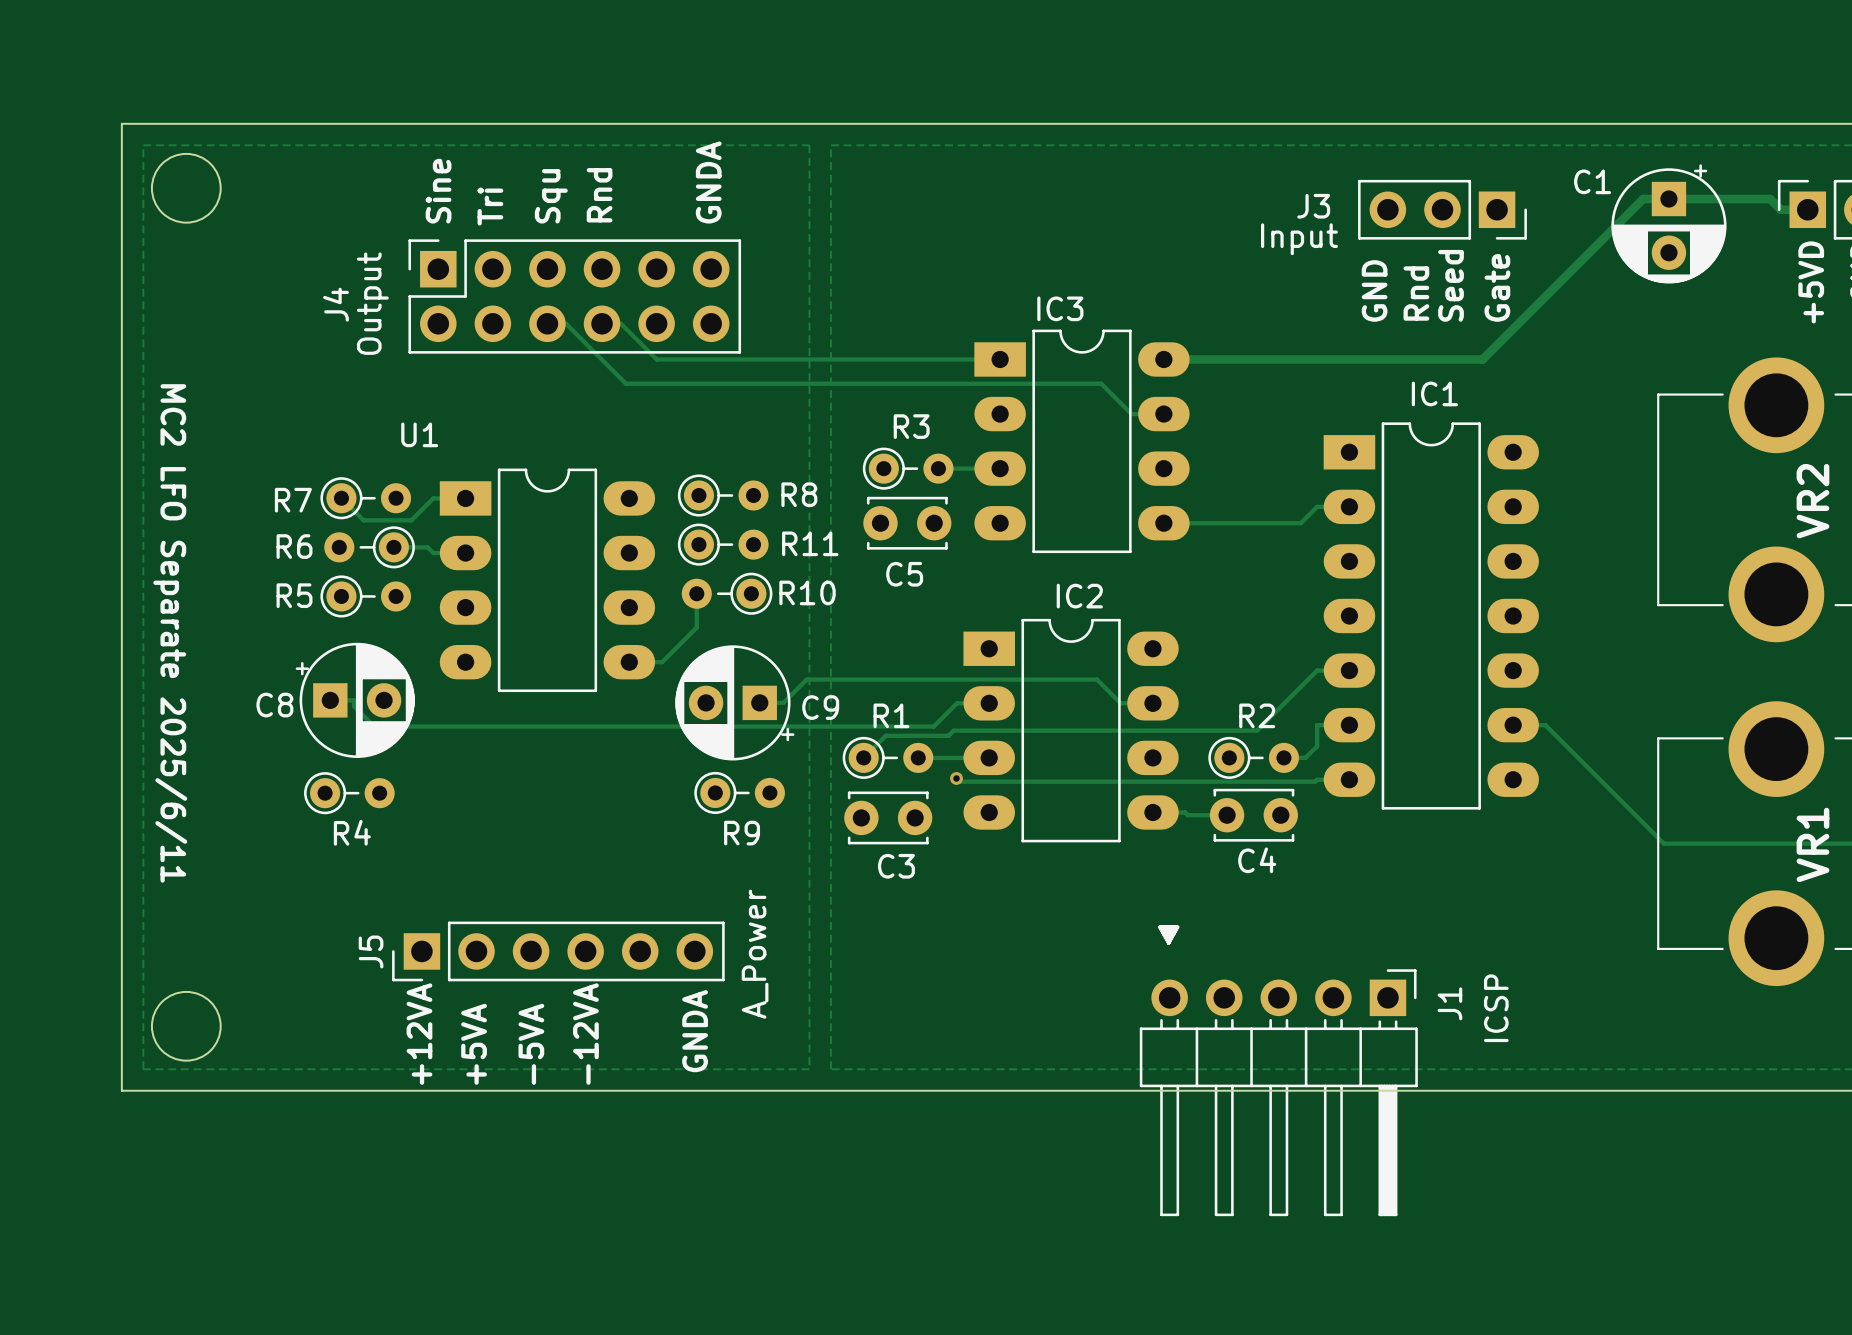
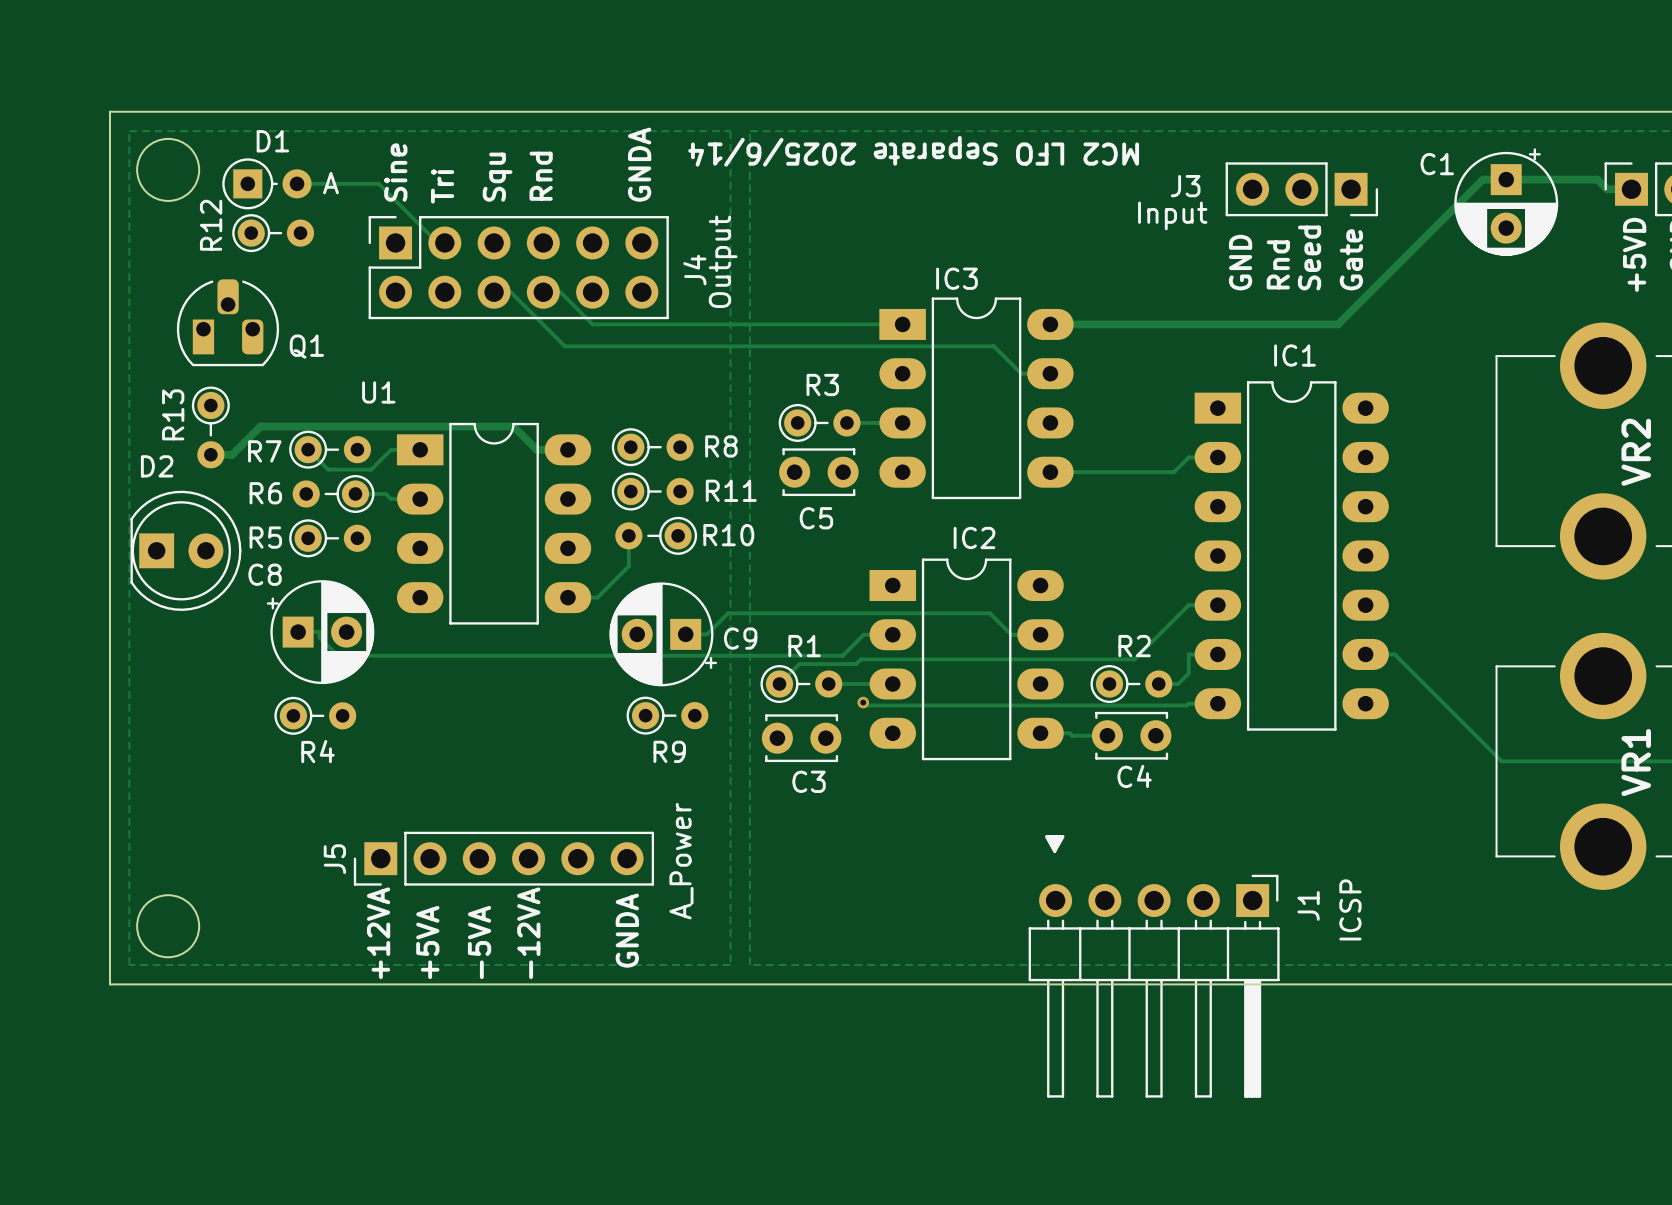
text: none -> MC2 LFO Separate 2025/6/14 (913, 151)
D1: none -> (266, 183)
track: none -> (297, 183) (378, 183) (437, 242) (444, 242)
R12: none -> (273, 233)
text position: Output (372, 303) -> Output (723, 261)
J4 name position: J4 (336, 304) -> J4 (694, 270)
Q1: none -> (227, 322)
R13: none -> (210, 427)
track: none -> (567, 449) (536, 449) (513, 426) (260, 426) (232, 454) (210, 454)
D2: none -> (185, 550)
text: MC2 LFO Separate 2025/6/11 (170, 633) -> none
C8 name position: C8 (274, 705) -> C8 (265, 574)

